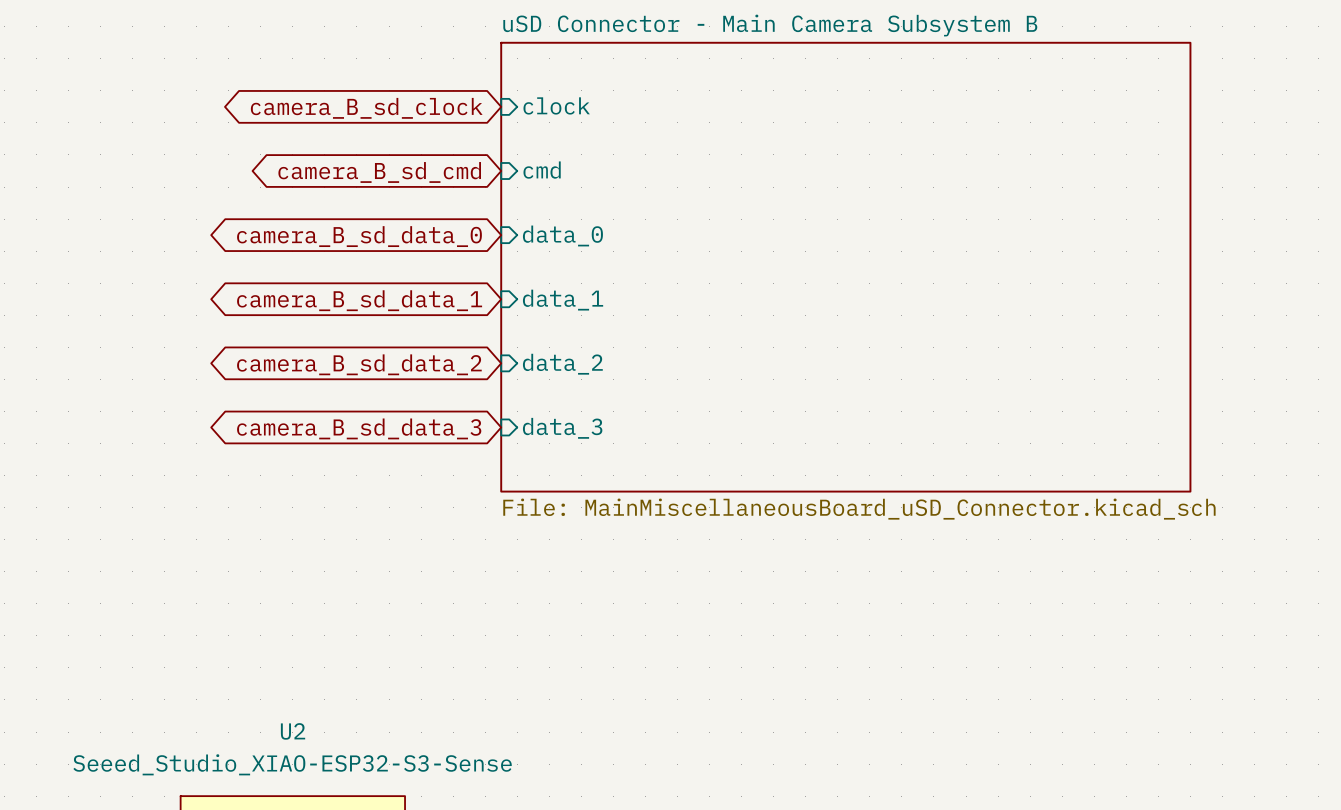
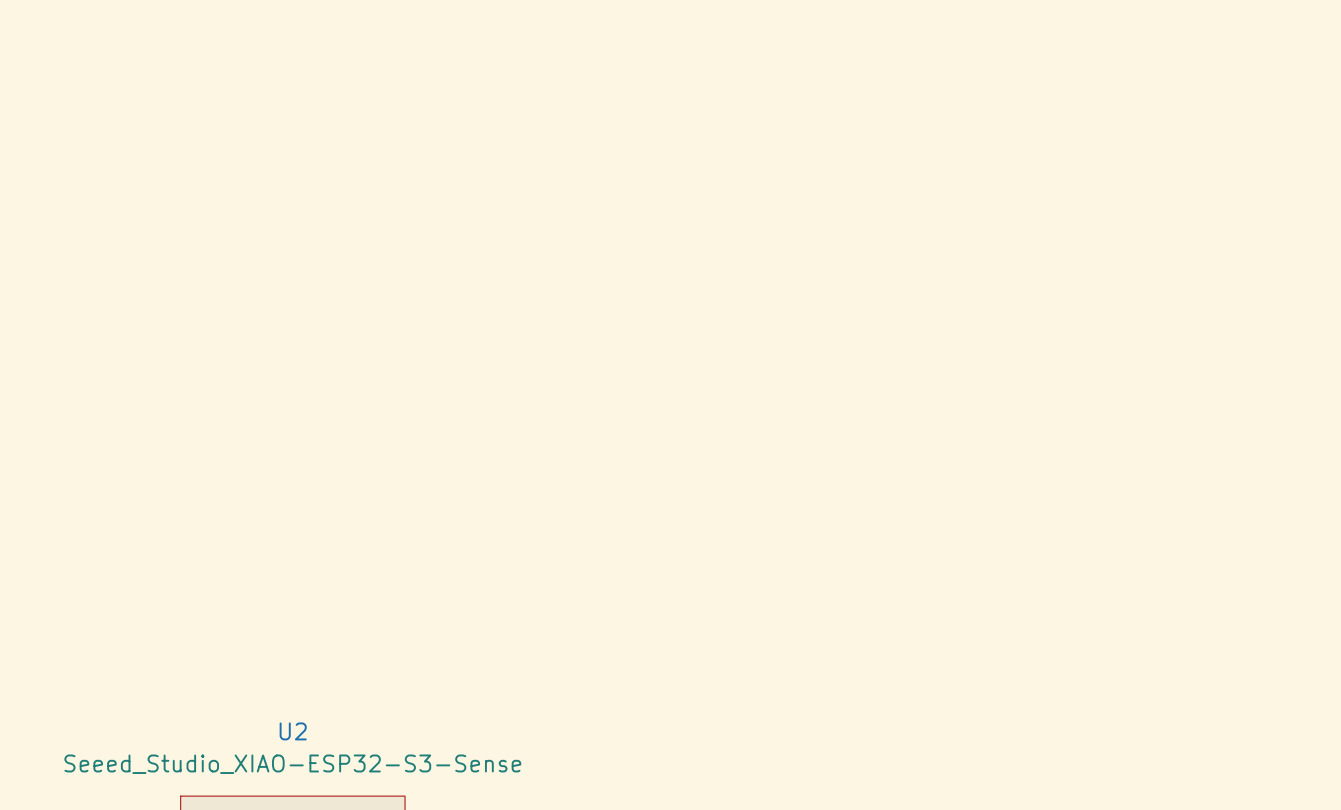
sheet pin: clock (556, 105) -> none
global label: camera_B_sd_clock (366, 108) -> none
sheet pin: cmd (542, 170) -> none
global label: camera_B_sd_cmd (379, 172) -> none
sheet pin: data_0 (562, 235) -> none
global label: camera_B_sd_data_0 (359, 236) -> none
sheet uSD Connector - Main Camera Subsystem B: File: MainMiscellaneousBoard_uSD_Connector.kicad_sch (845, 267) -> none
global label: camera_B_sd_data_1 (359, 300) -> none
sheet pin: data_1 (563, 300) -> none
global label: camera_B_sd_data_2 (359, 364) -> none
sheet pin: data_2 (562, 364) -> none
global label: camera_B_sd_data_3 (359, 428) -> none
sheet pin: data_3 (562, 428) -> none

